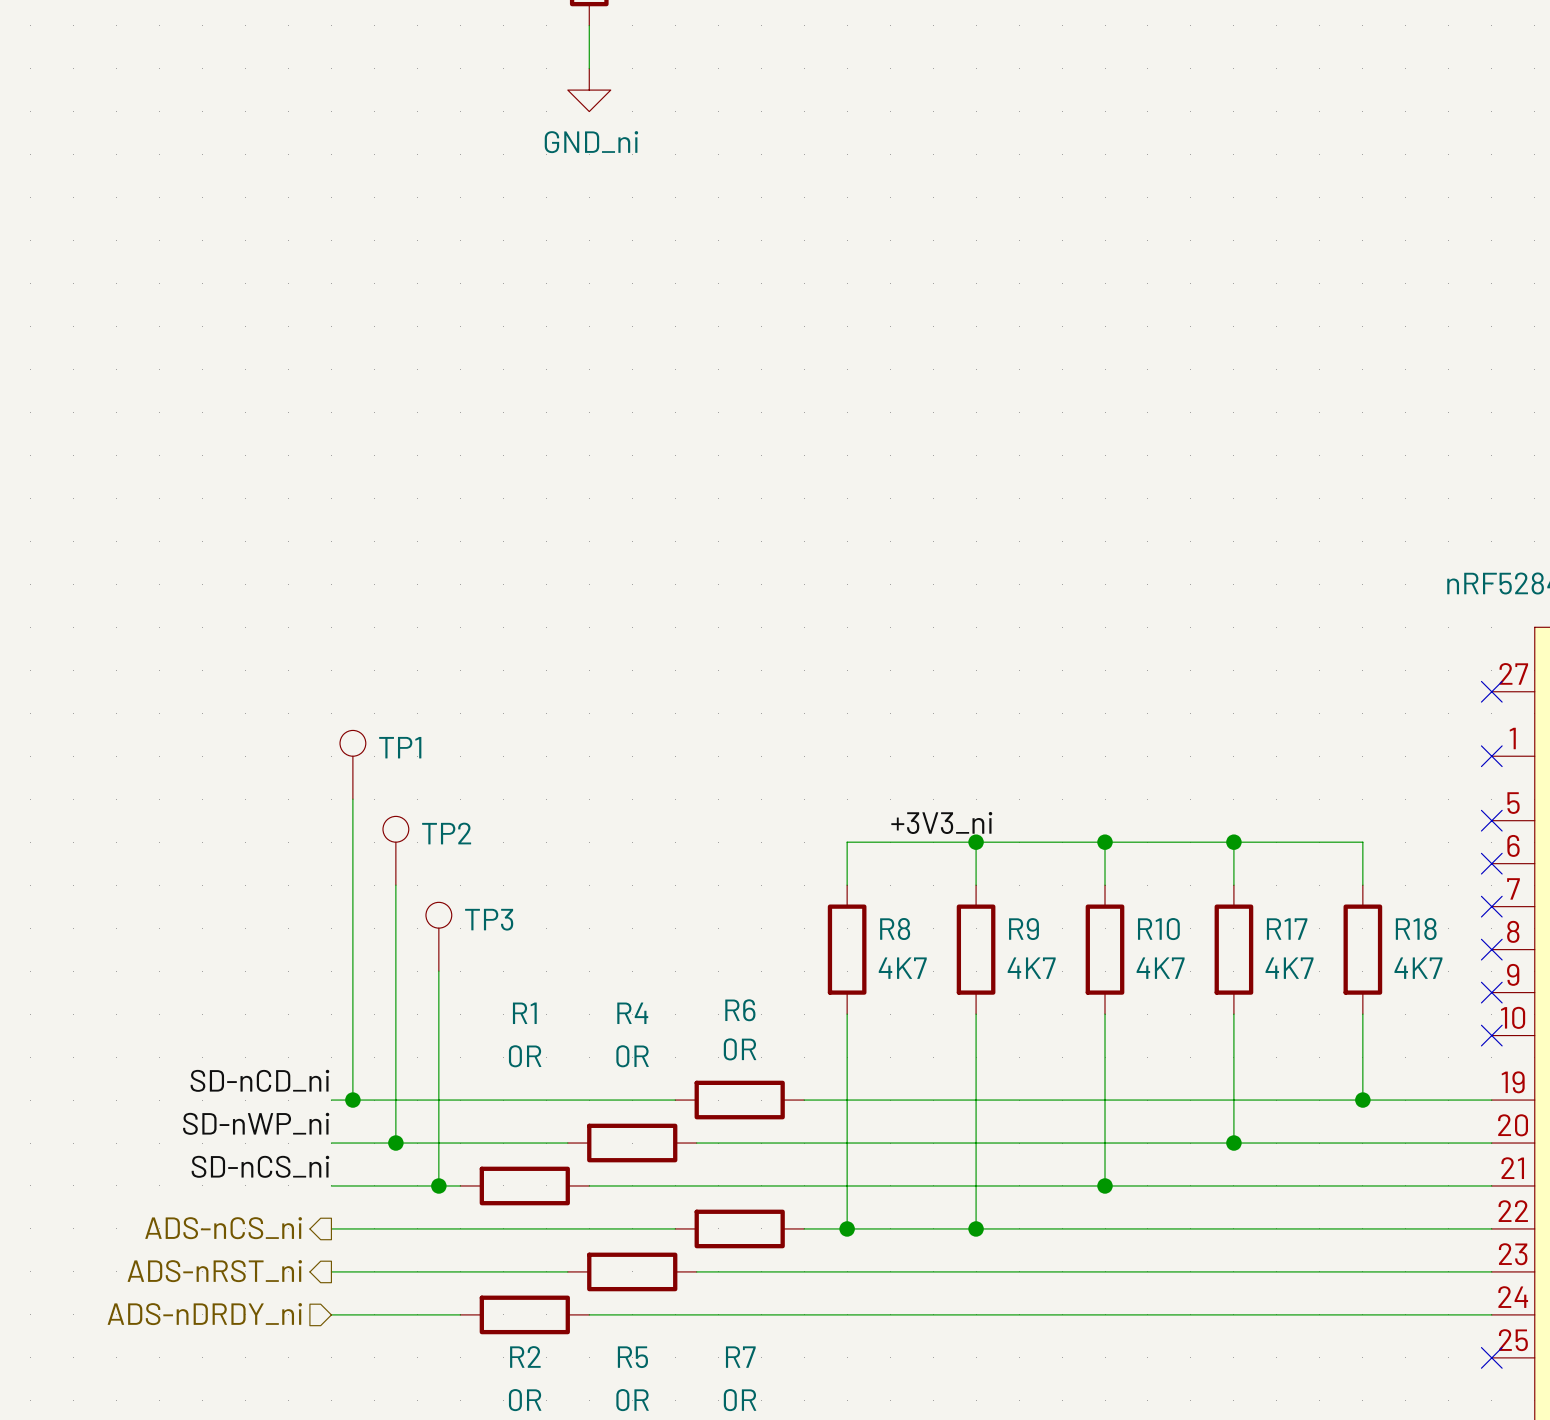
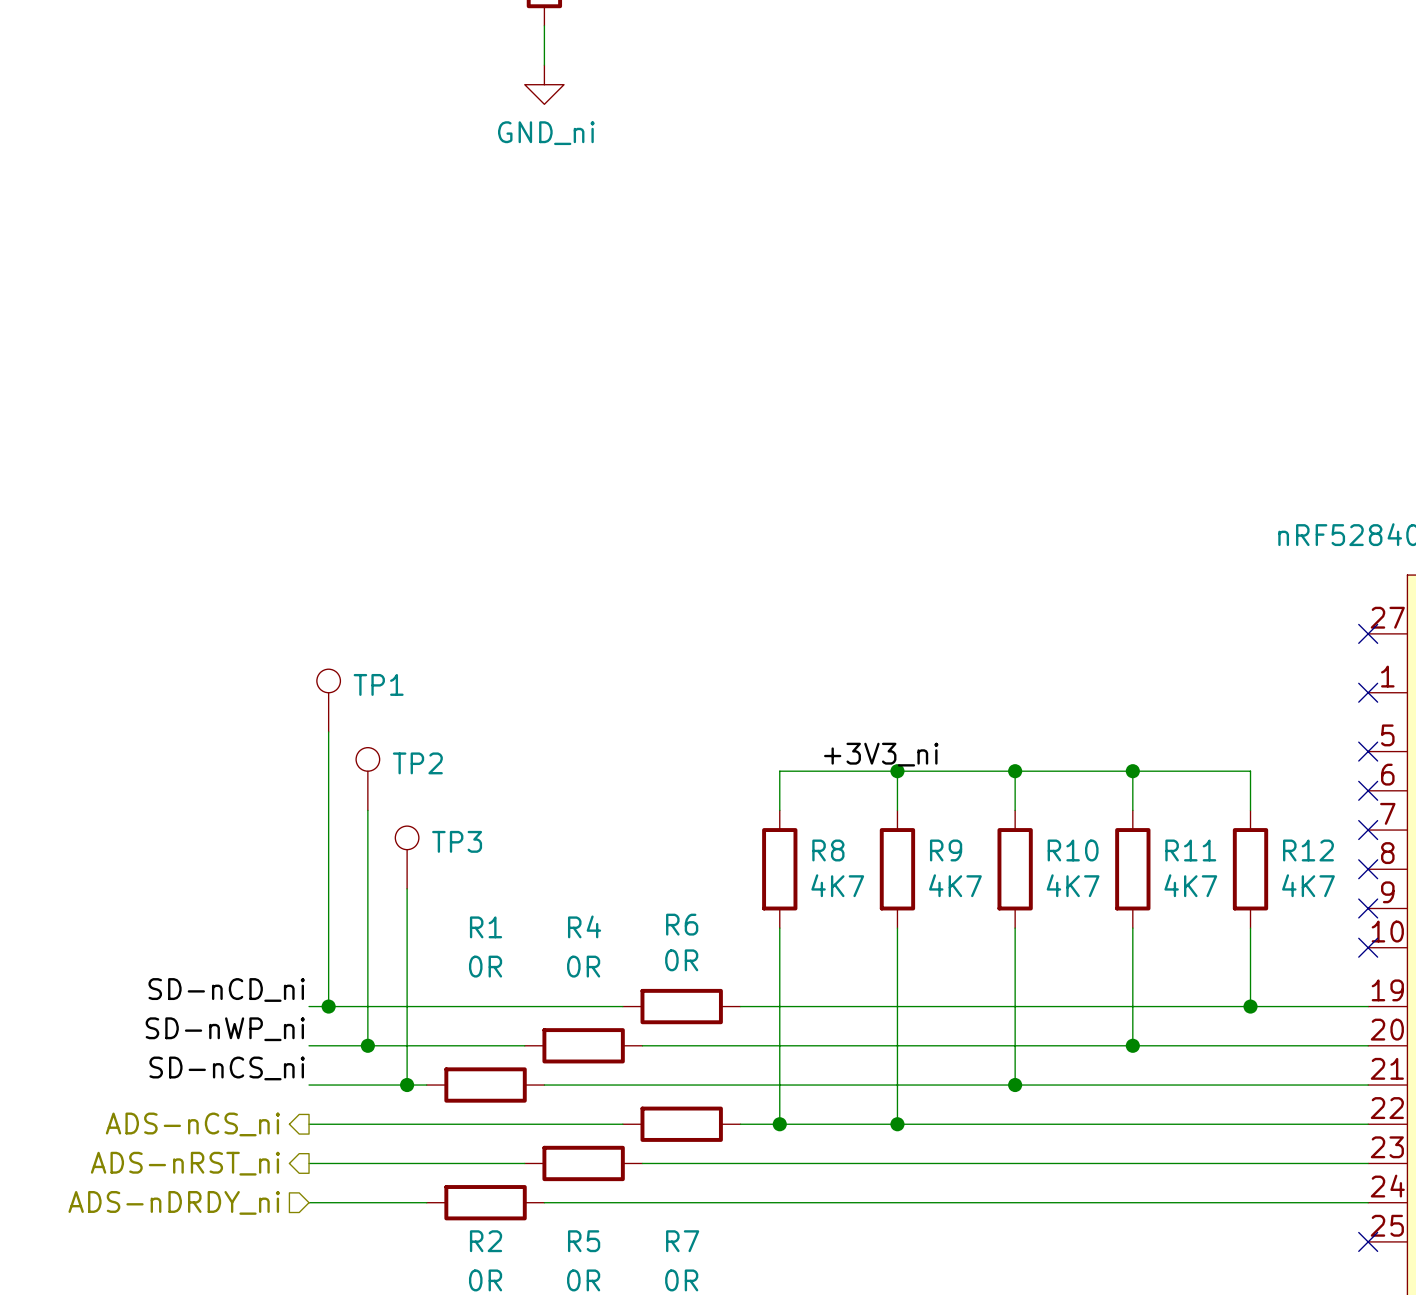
R17 name: R17 (1287, 929) -> R11 (1190, 850)
R18 name: R18 (1416, 929) -> R12 (1308, 850)

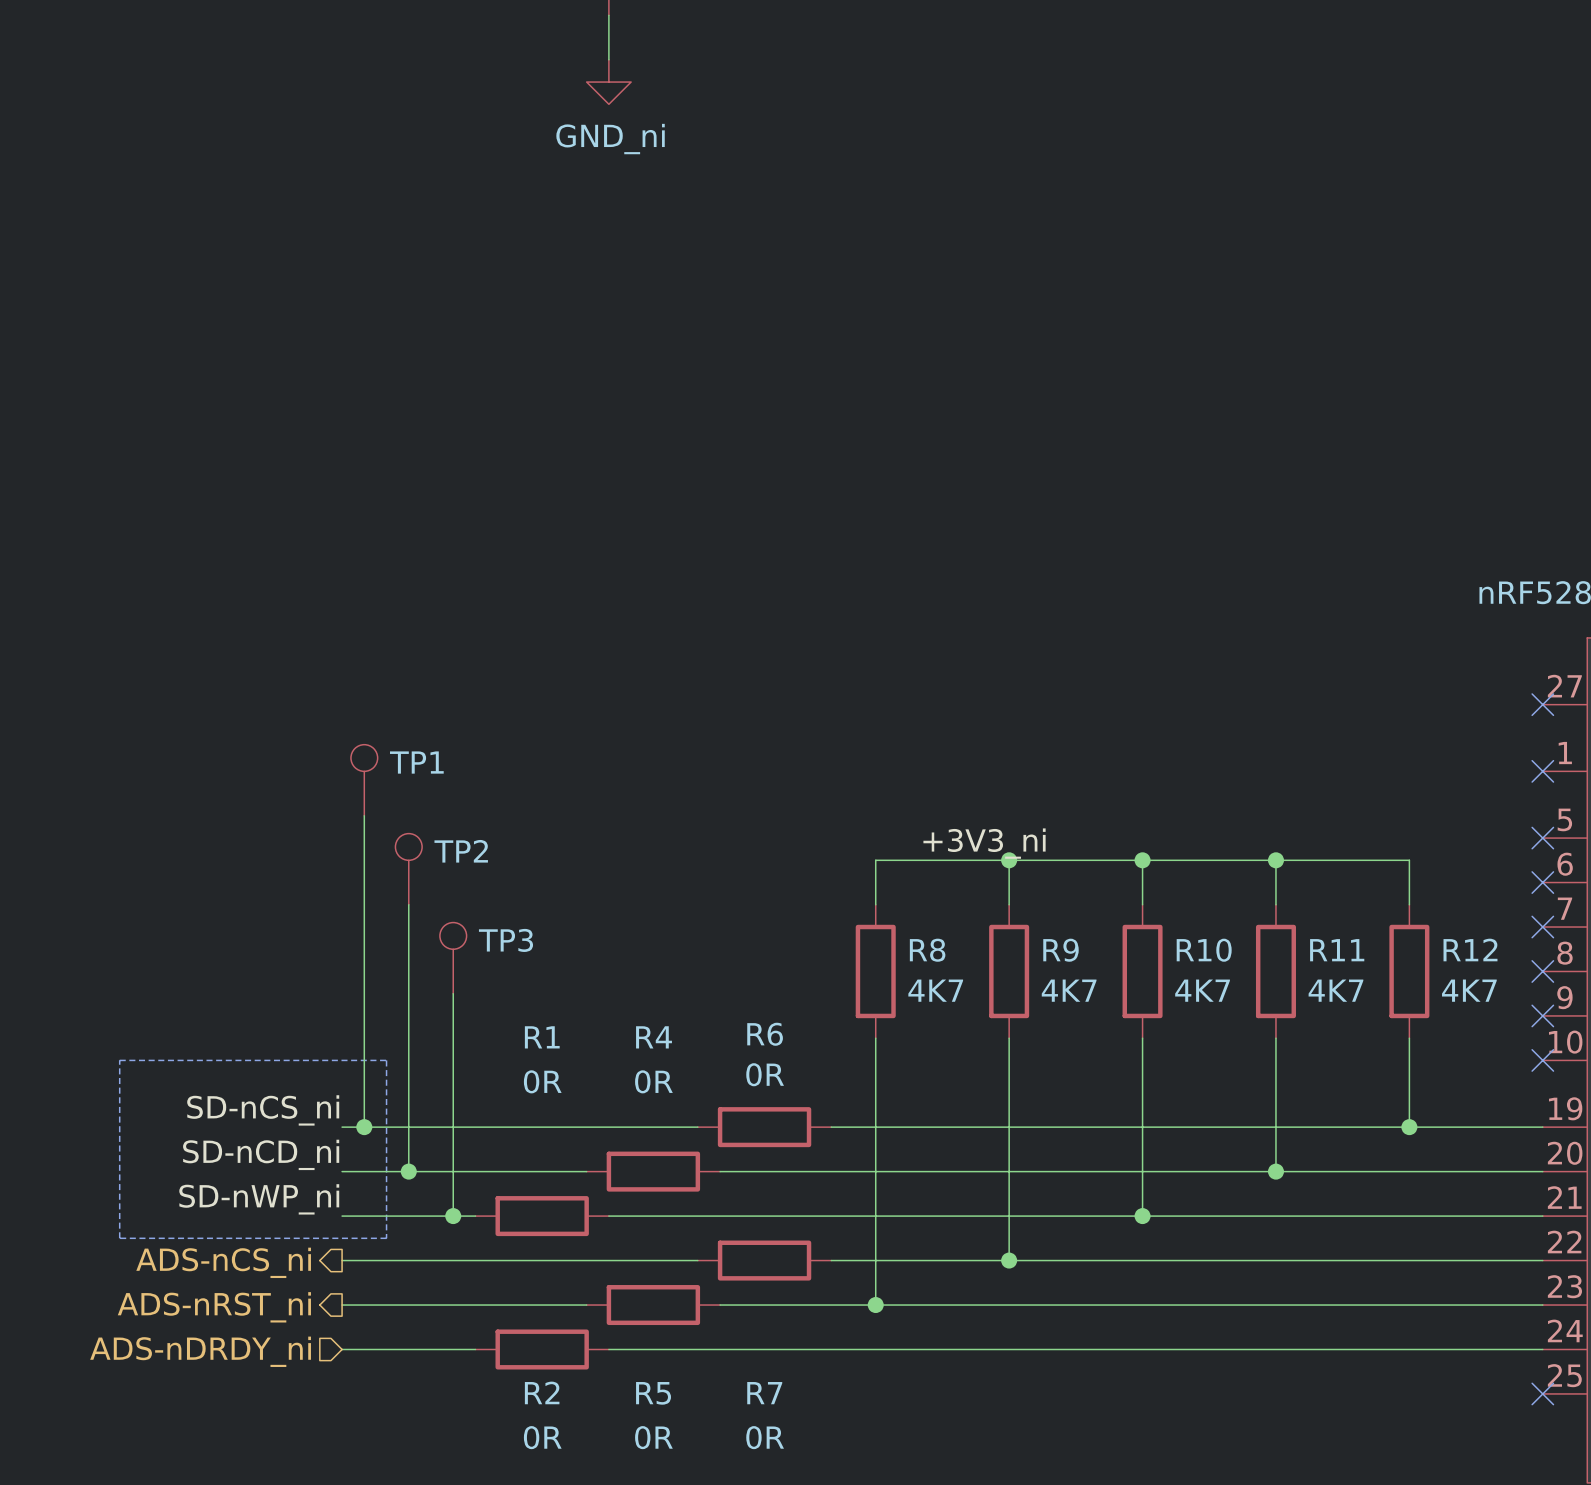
line: none -> (119, 1060) (386, 1060) (386, 1238) (119, 1238) (119, 1060)
label: SD-nCD_ni (226, 989) -> SD-nCS_ni (263, 1110)
label: SD-nWP_ni (225, 1029) -> SD-nCD_ni (261, 1154)
label: SD-nCS_ni (227, 1068) -> SD-nWP_ni (259, 1199)
wire: none -> (875, 1260) (875, 1305)
junction position: (779, 1124) -> (875, 1305)

